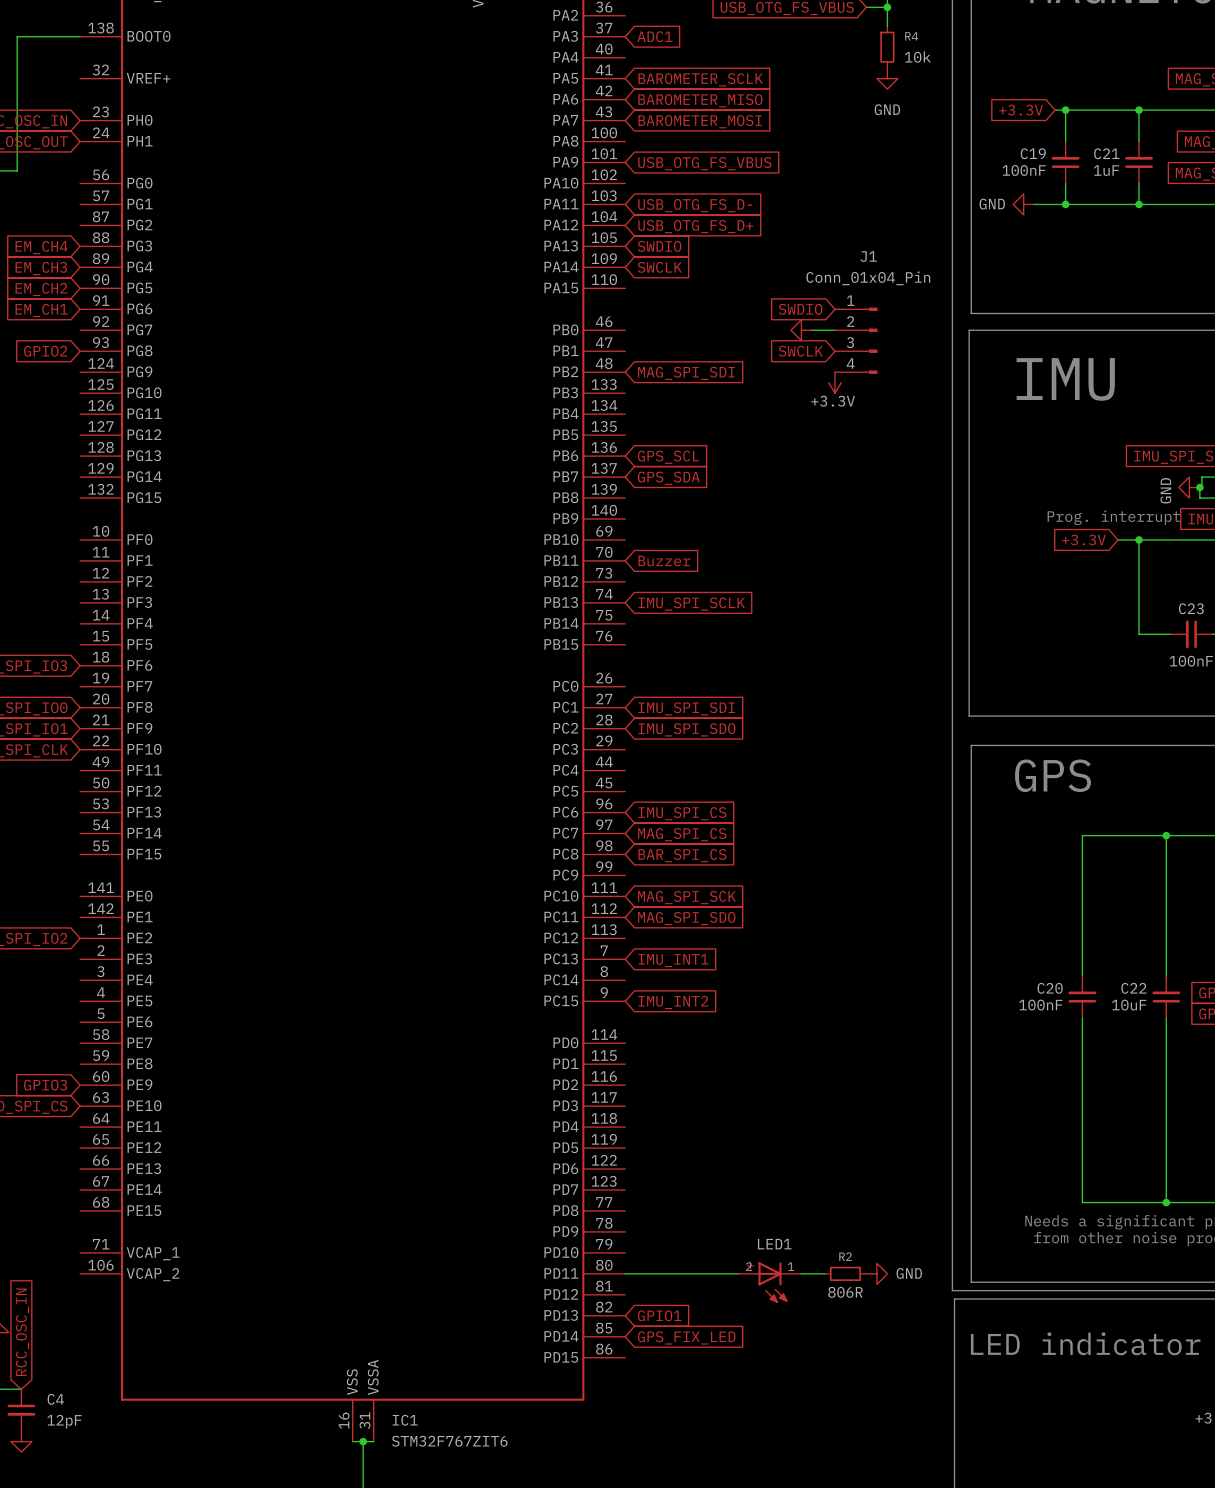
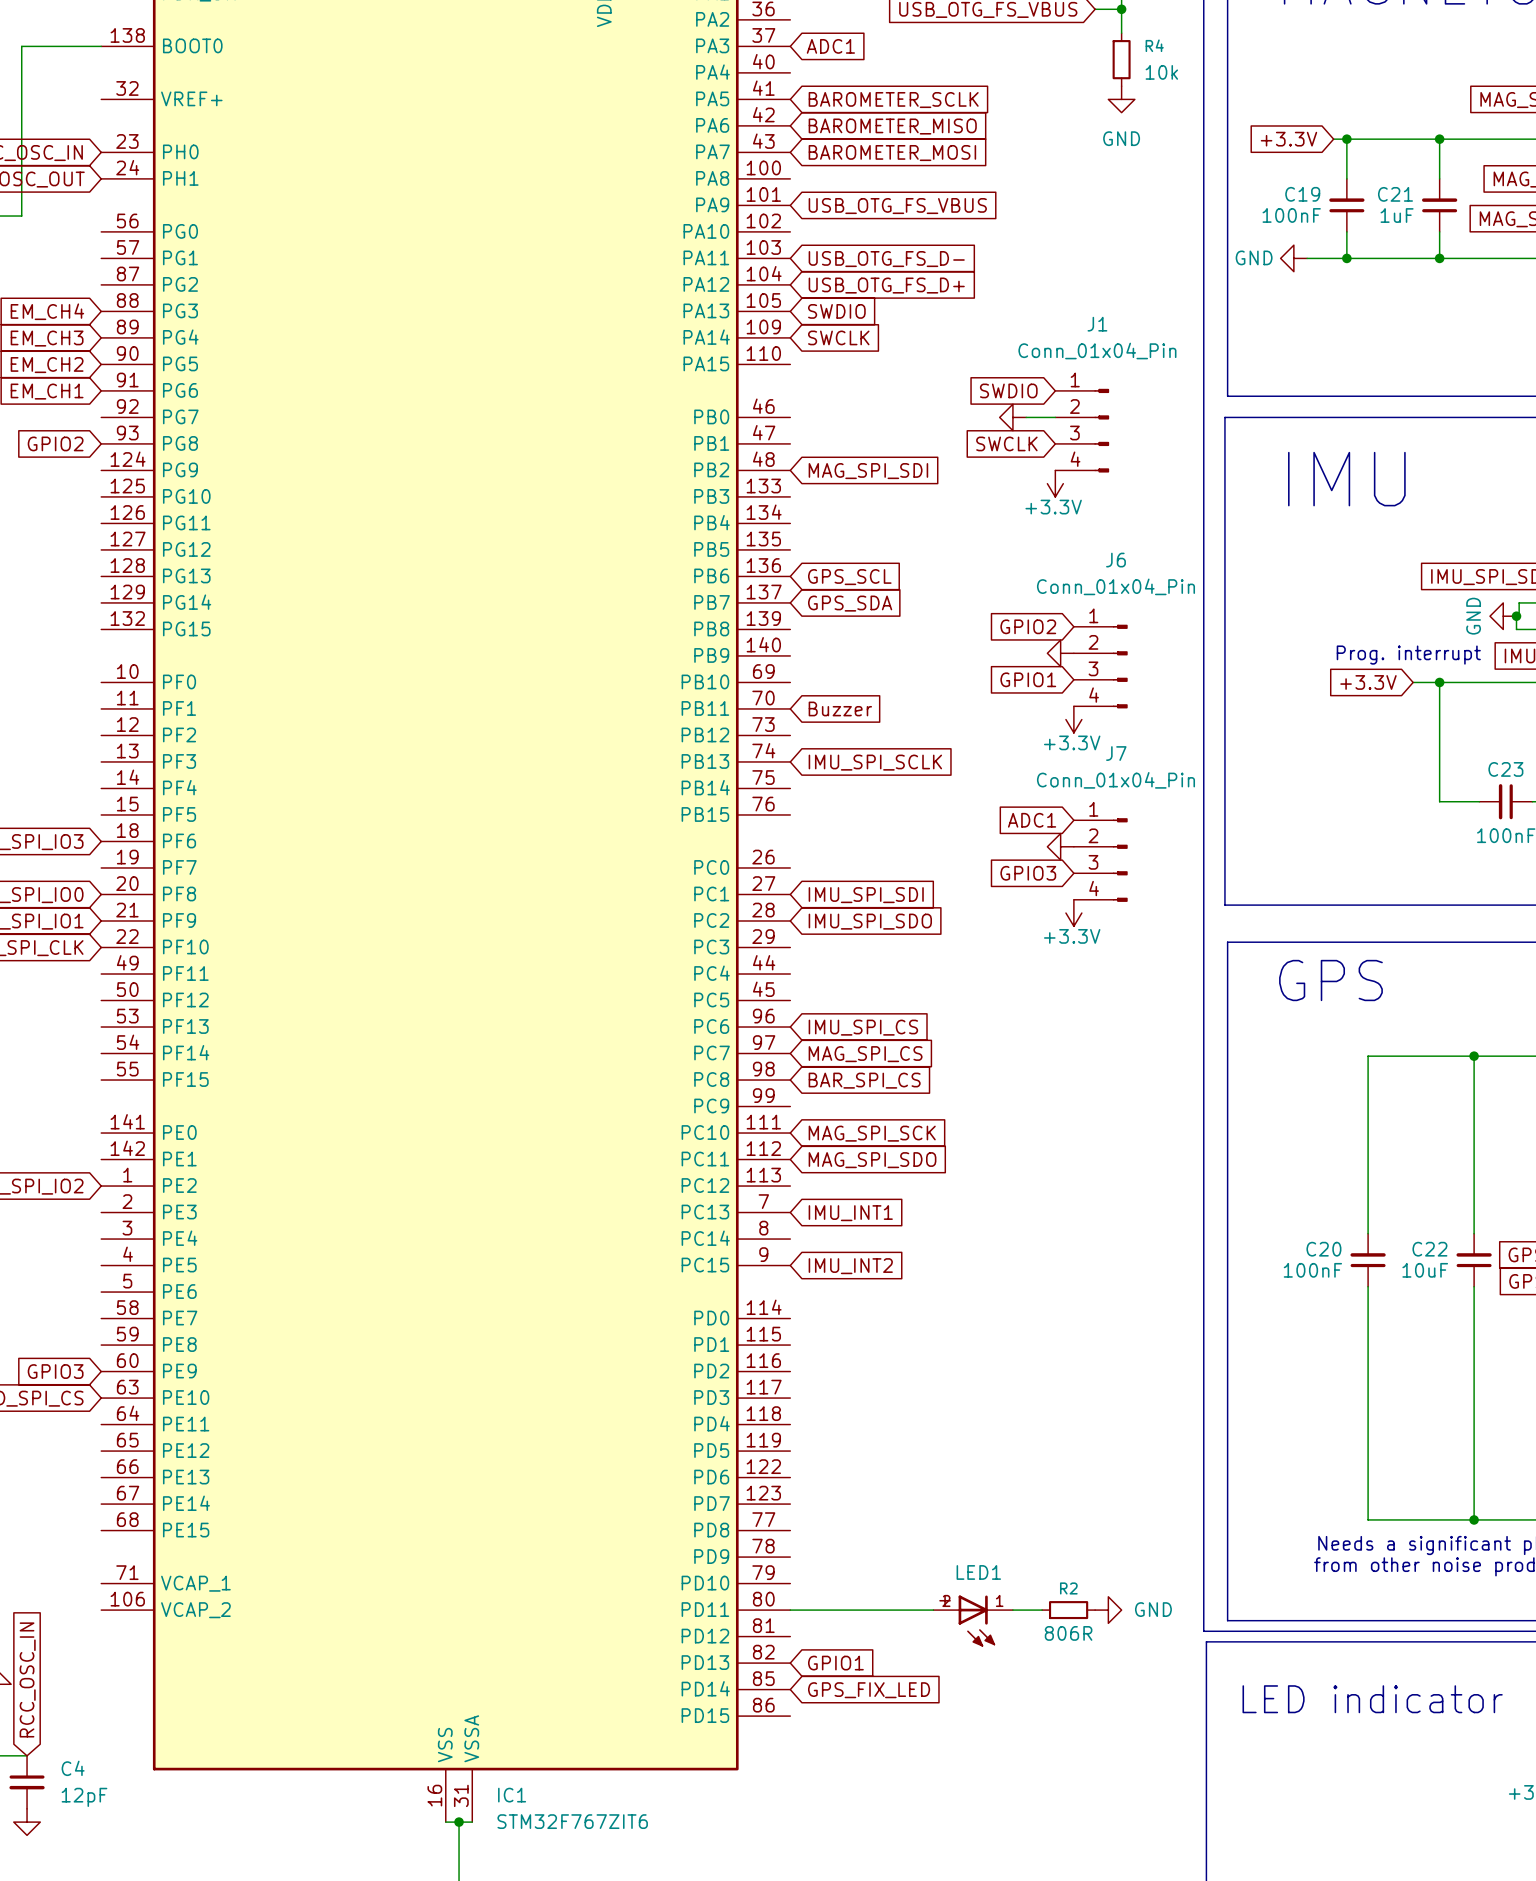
global label: none -> GPIO2 (1028, 626)
power symbol: none -> (1060, 653)
J6: none -> Conn_01x04_Pin (1100, 666)
global label: none -> GPIO1 (1028, 679)
power symbol: none -> +3.3V (1073, 719)
global label: none -> ADC1 (1032, 820)
power symbol: none -> (1060, 846)
J7: none -> Conn_01x04_Pin (1100, 860)
global label: none -> GPIO3 (1028, 873)
power symbol: none -> +3.3V (1073, 913)

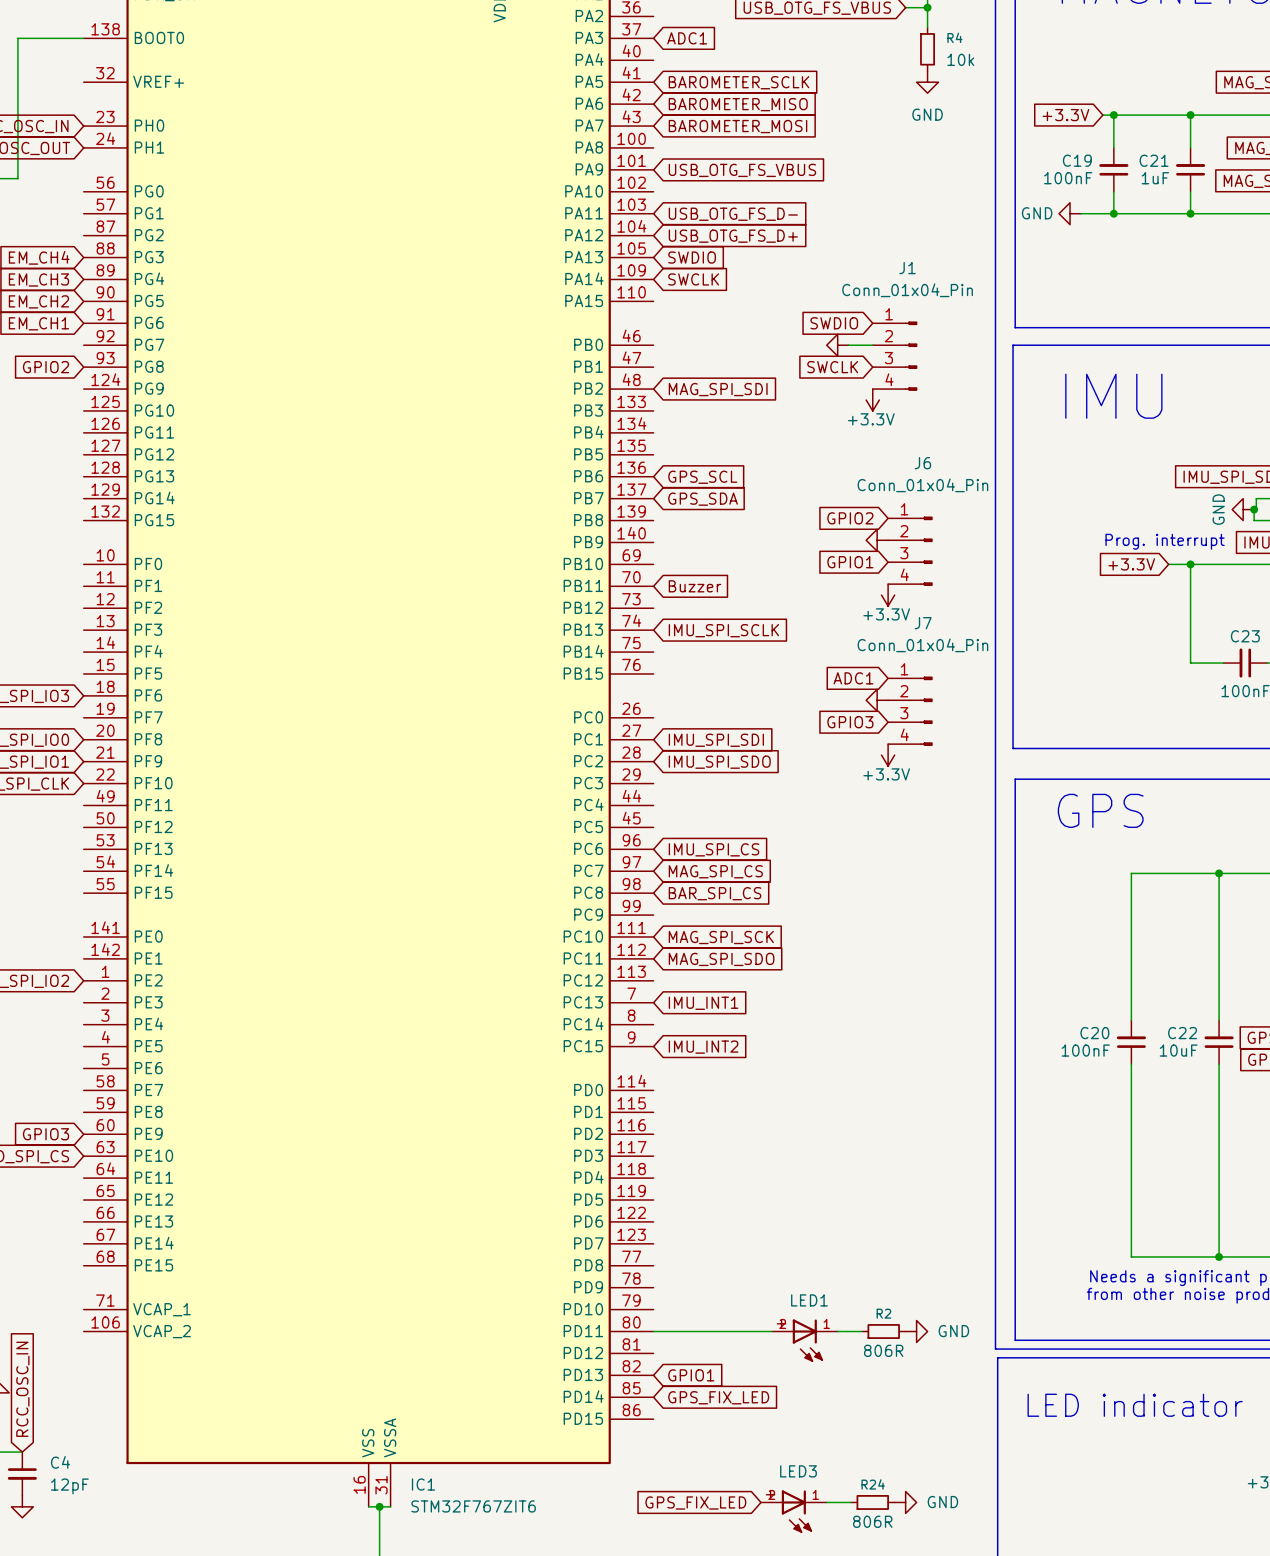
wire: none -> (826, 1502) (850, 1502)
R24: none -> 806R (872, 1502)
power symbol: none -> GND (905, 1502)
global label: none -> GPS_FIX_LED (695, 1502)
LED3: none -> (793, 1511)

